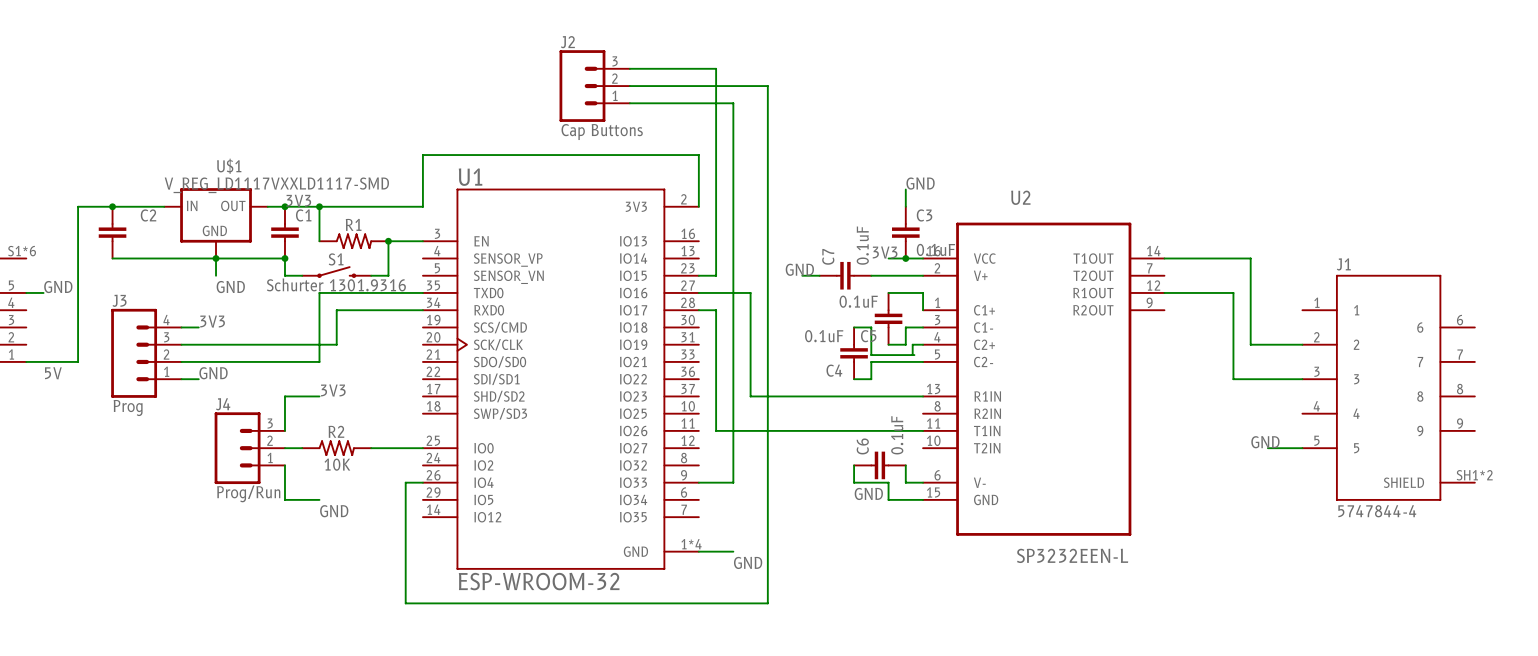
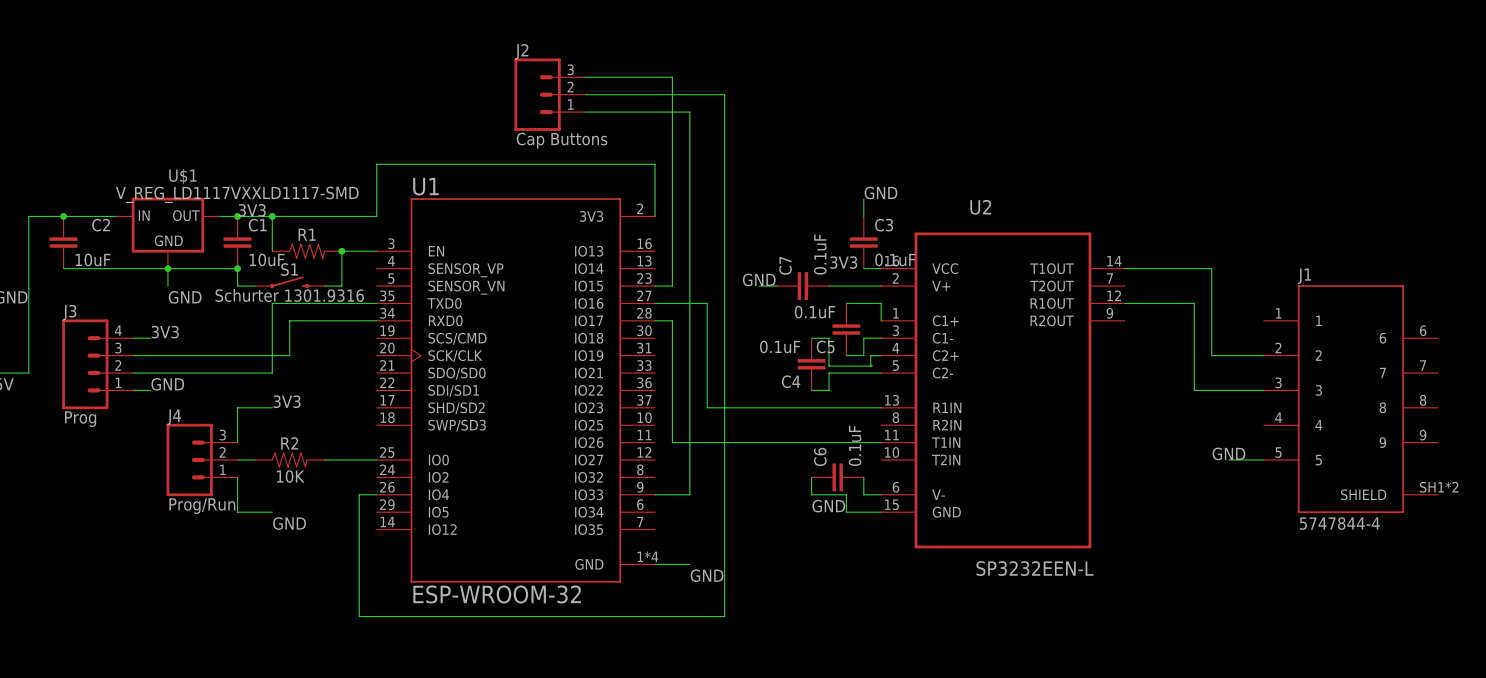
C2 value: none -> 10uF (93, 259)
C1 value: none -> 10uF (267, 259)
wire: (888, 258) (905, 258) -> none
junction: (905, 258) -> none

